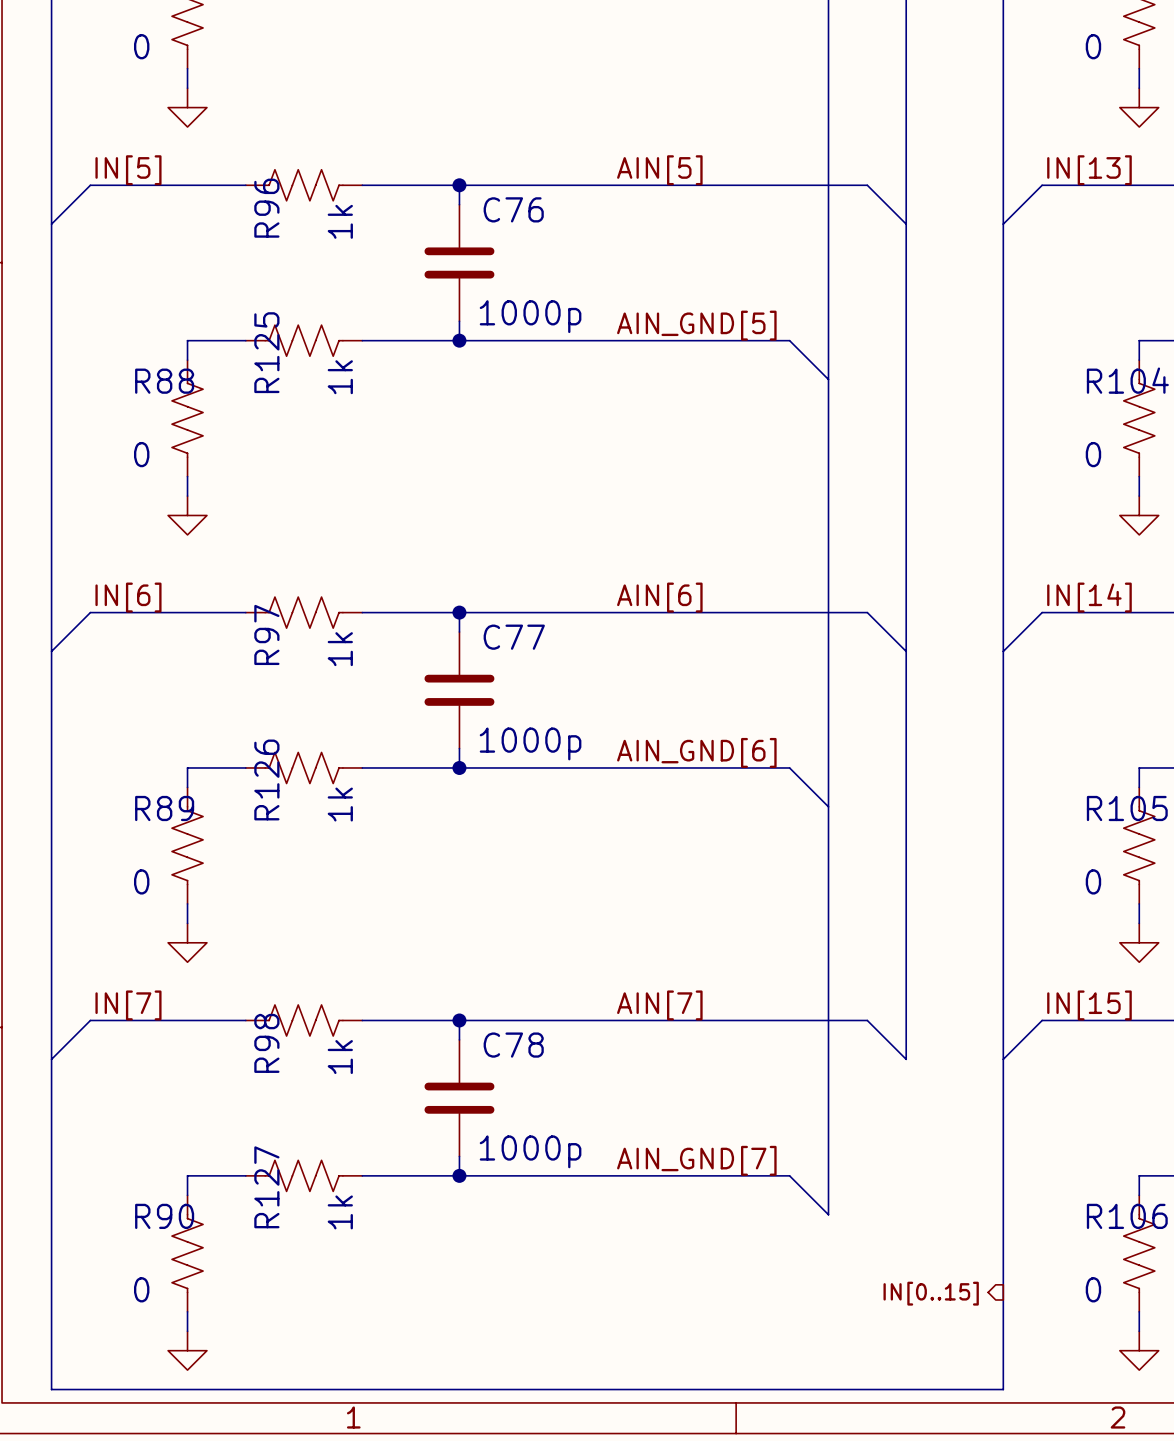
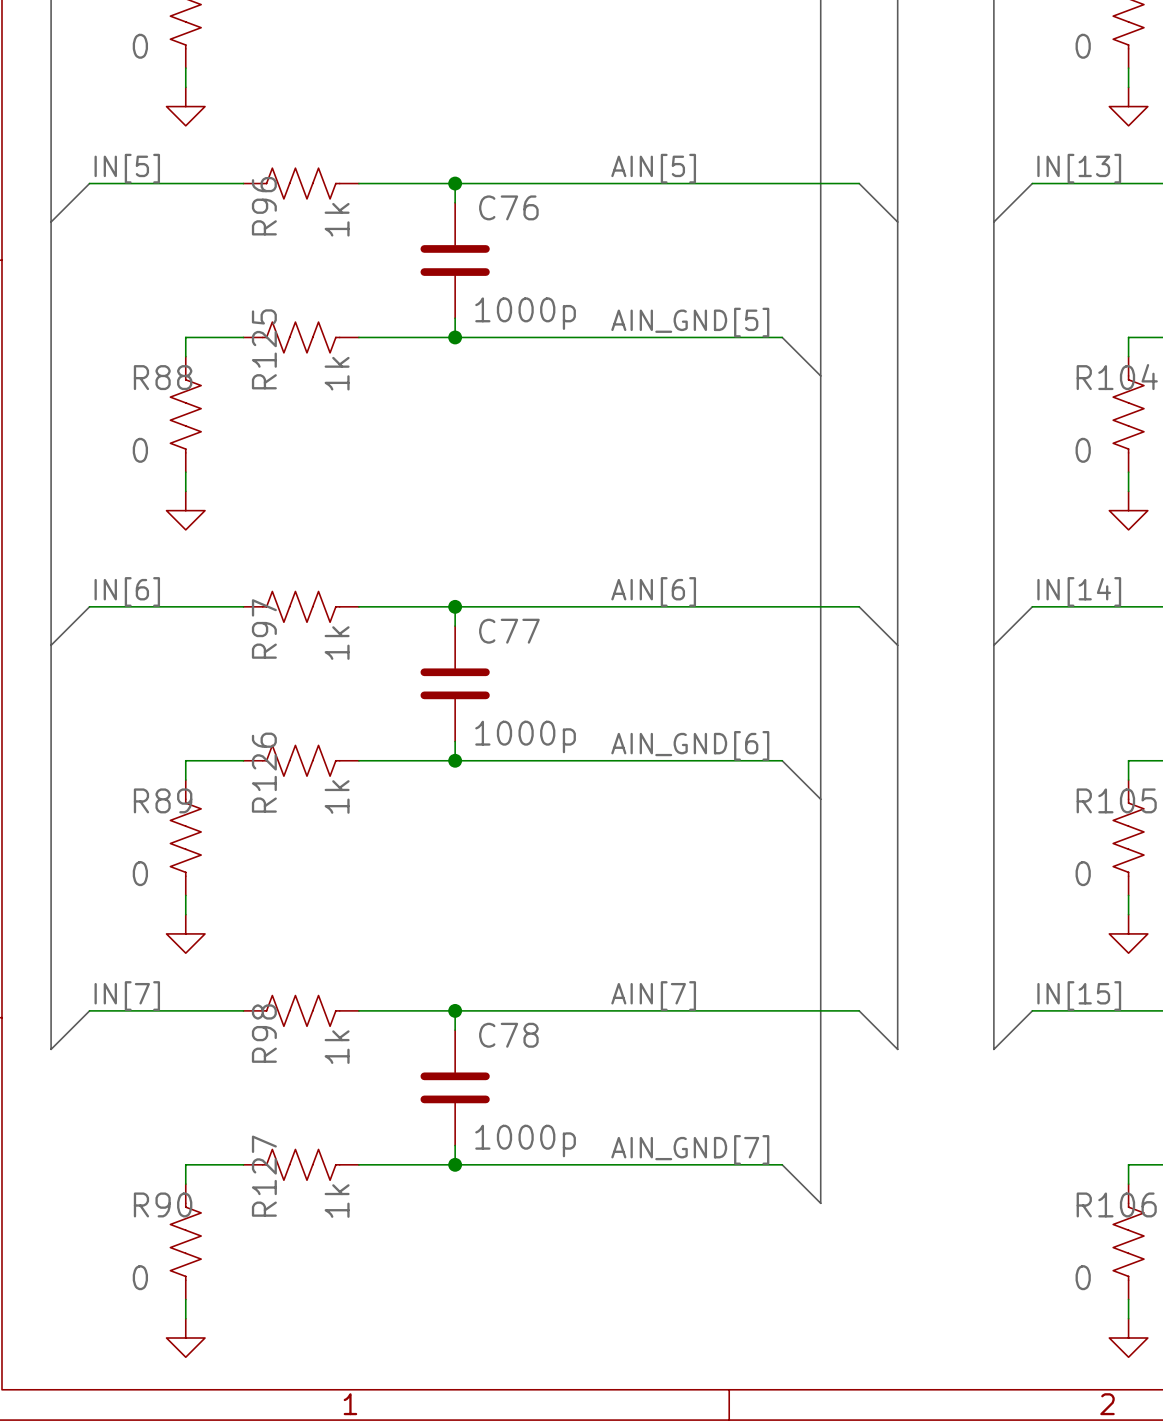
bus: (51, 1059) (51, 1389) (1003, 1389) (1003, 1059) -> none
hierarchical label: IN[0..15] (931, 1293) -> none

